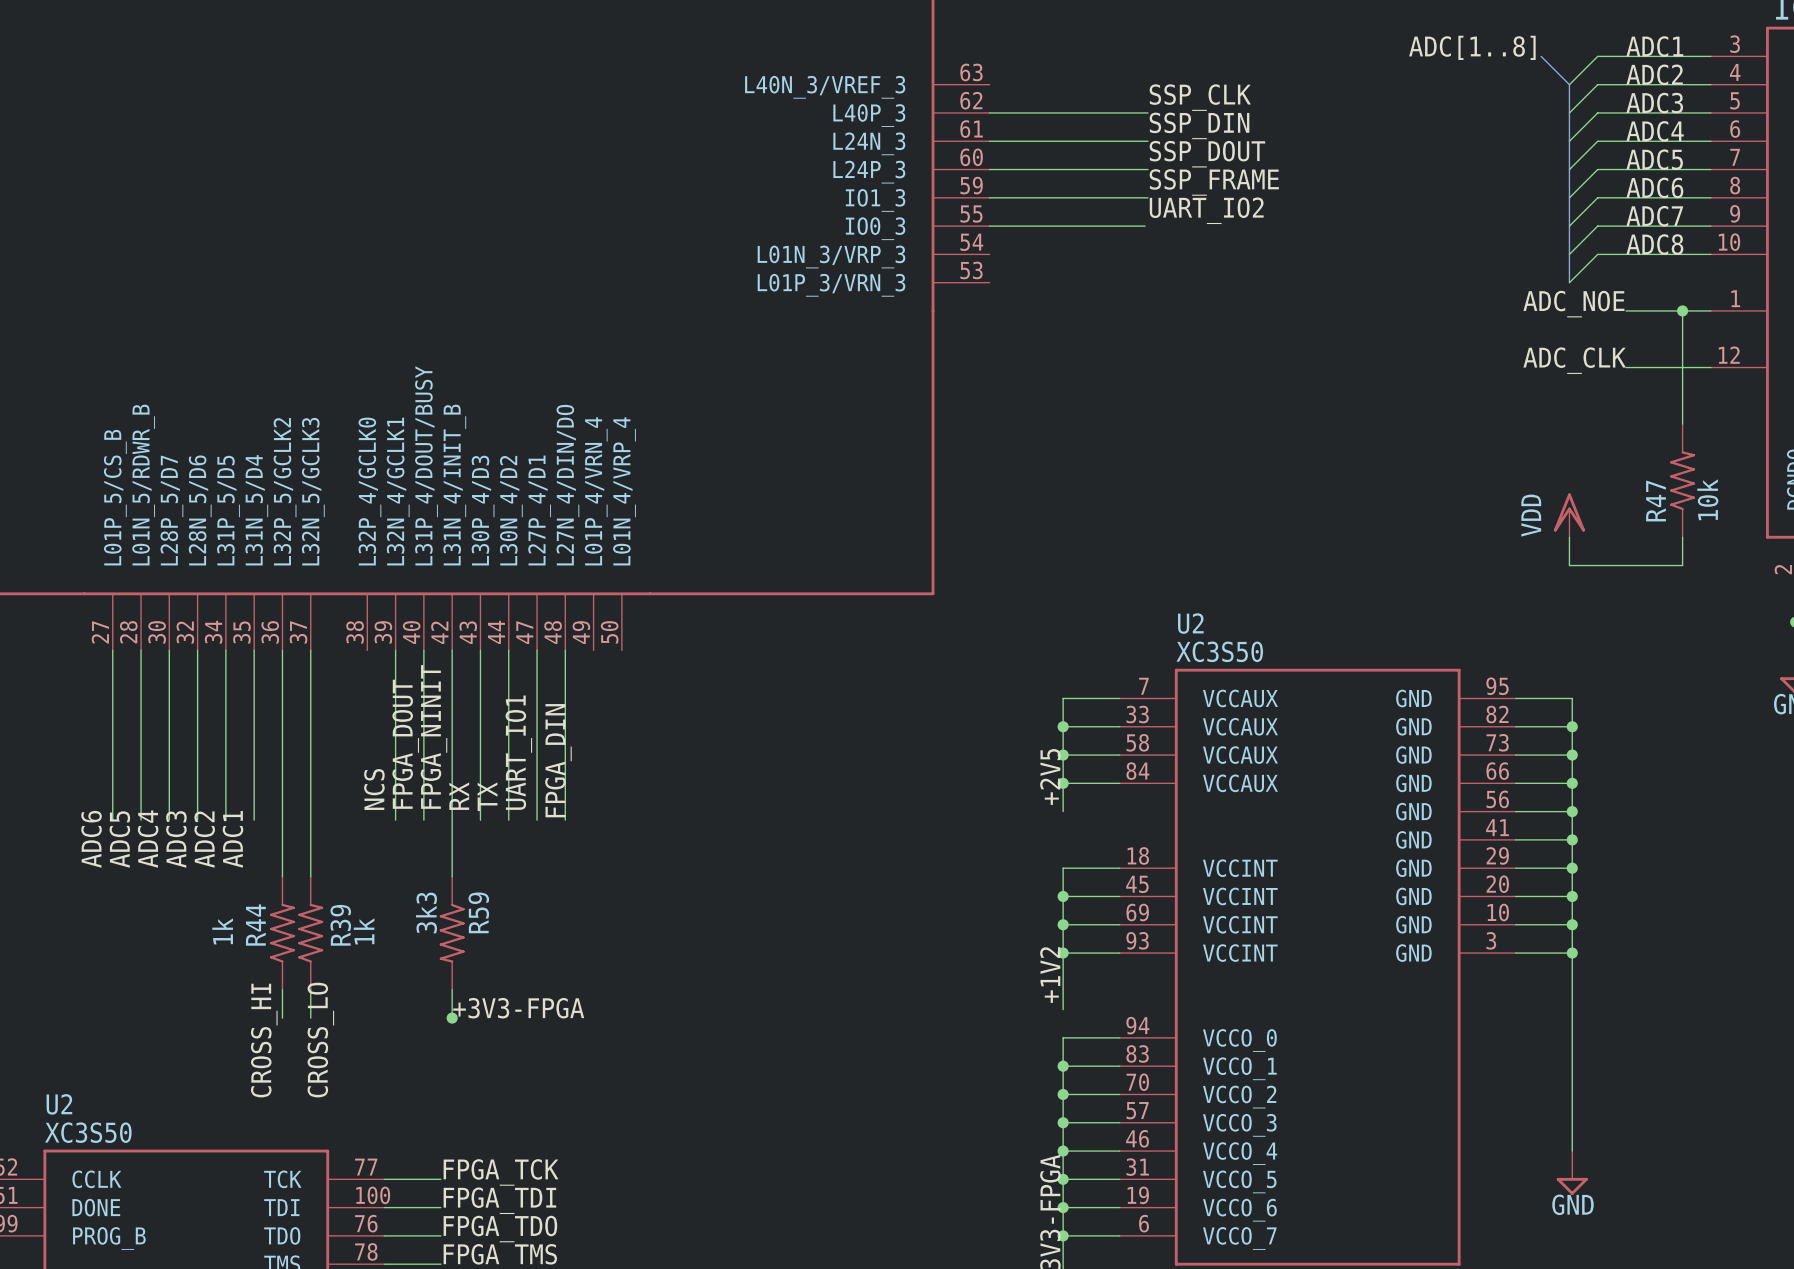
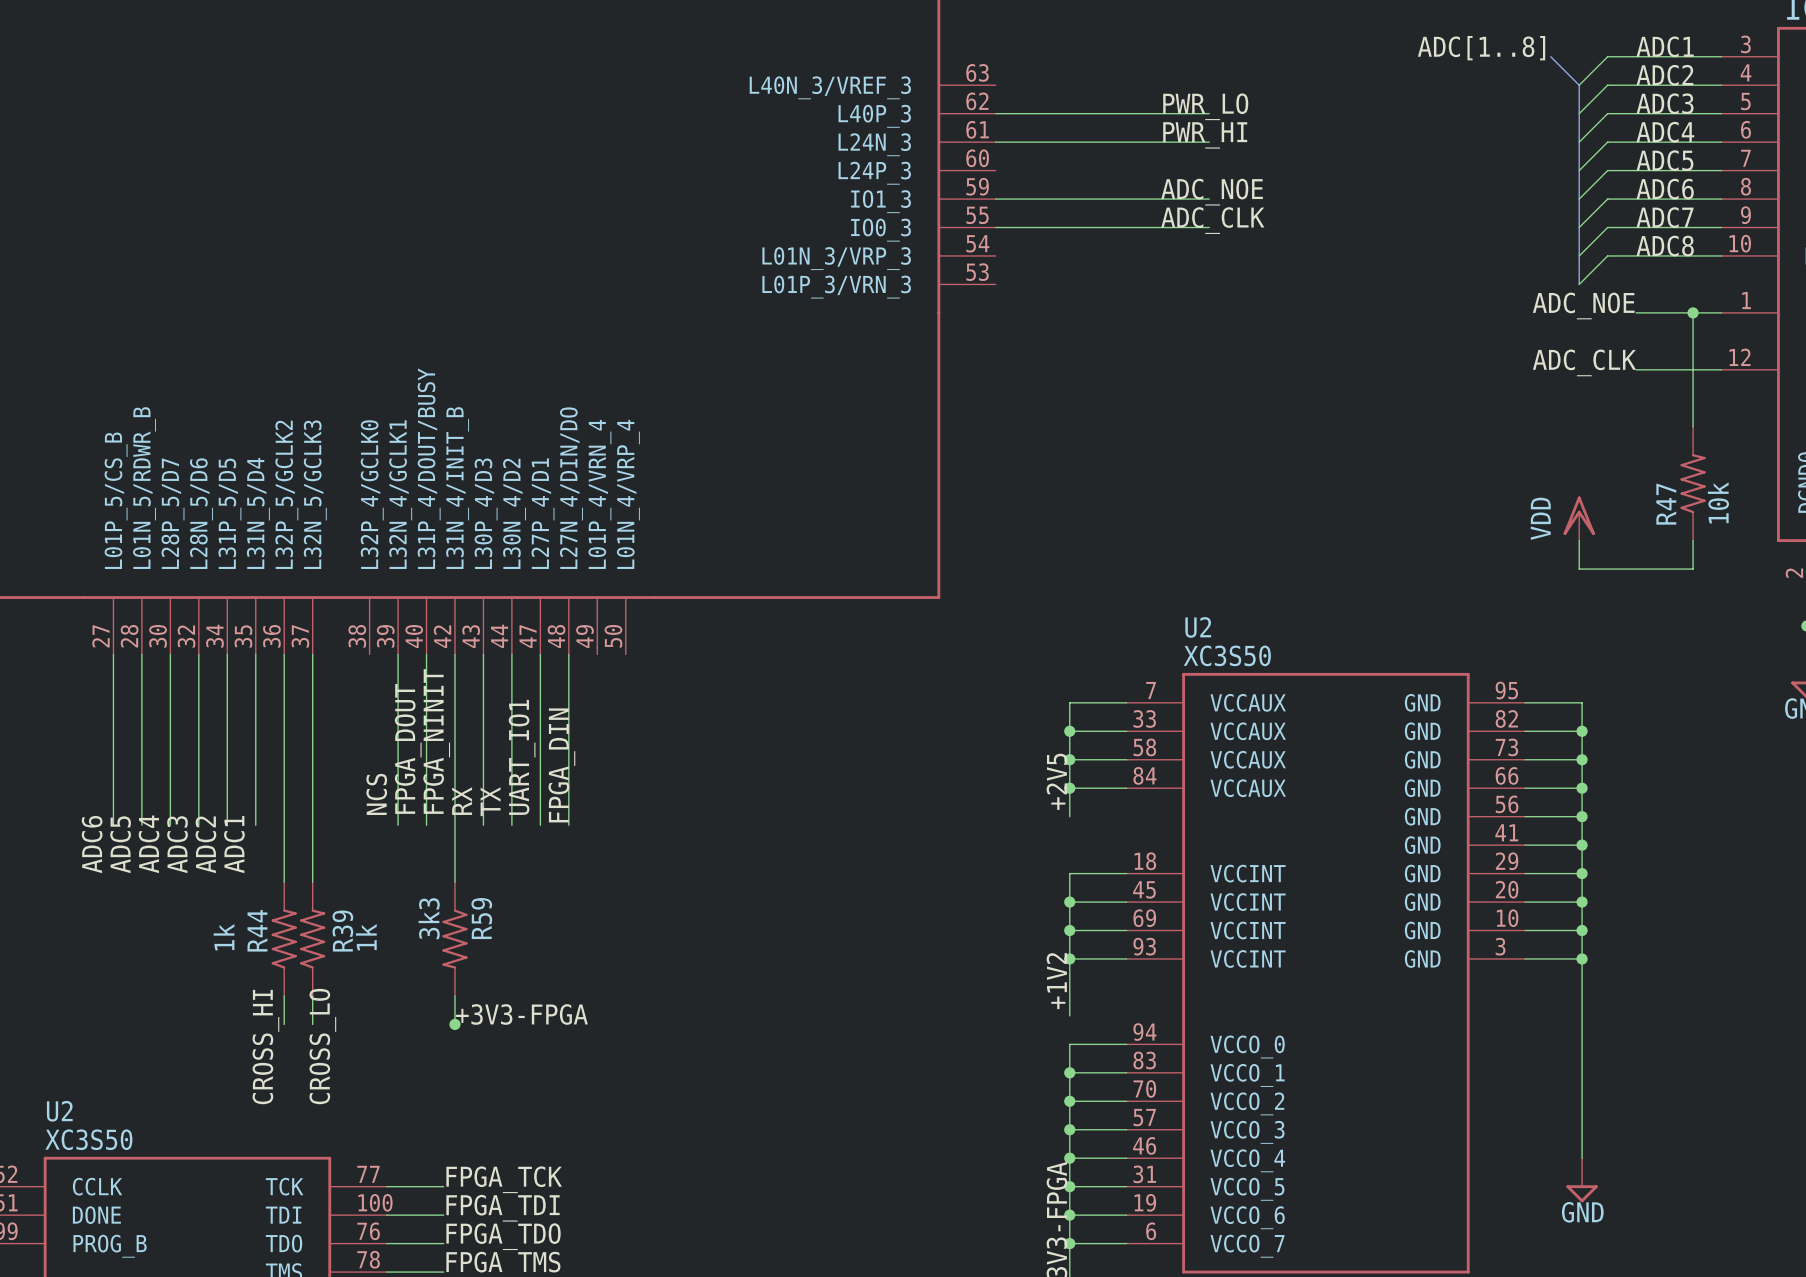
label: SSP_CLK (1200, 97) -> none
label: none -> PWR_LO (1205, 106)
wire: none -> (1155, 113) (1209, 113)
label: SSP_DIN (1199, 125) -> none
label: none -> PWR_HI (1205, 135)
wire: none -> (1155, 142) (1209, 142)
label: SSP_DOUT (1207, 154) -> none
wire: (989, 169) (1147, 169) -> none
label: SSP_FRAME (1214, 182) -> none
label: none -> ADC_NOE (1212, 192)
wire: none -> (1155, 199) (1209, 199)
label: UART_IO2 (1206, 210) -> none
label: none -> ADC_CLK (1212, 220)
wire: none -> (1152, 227) (1209, 227)

